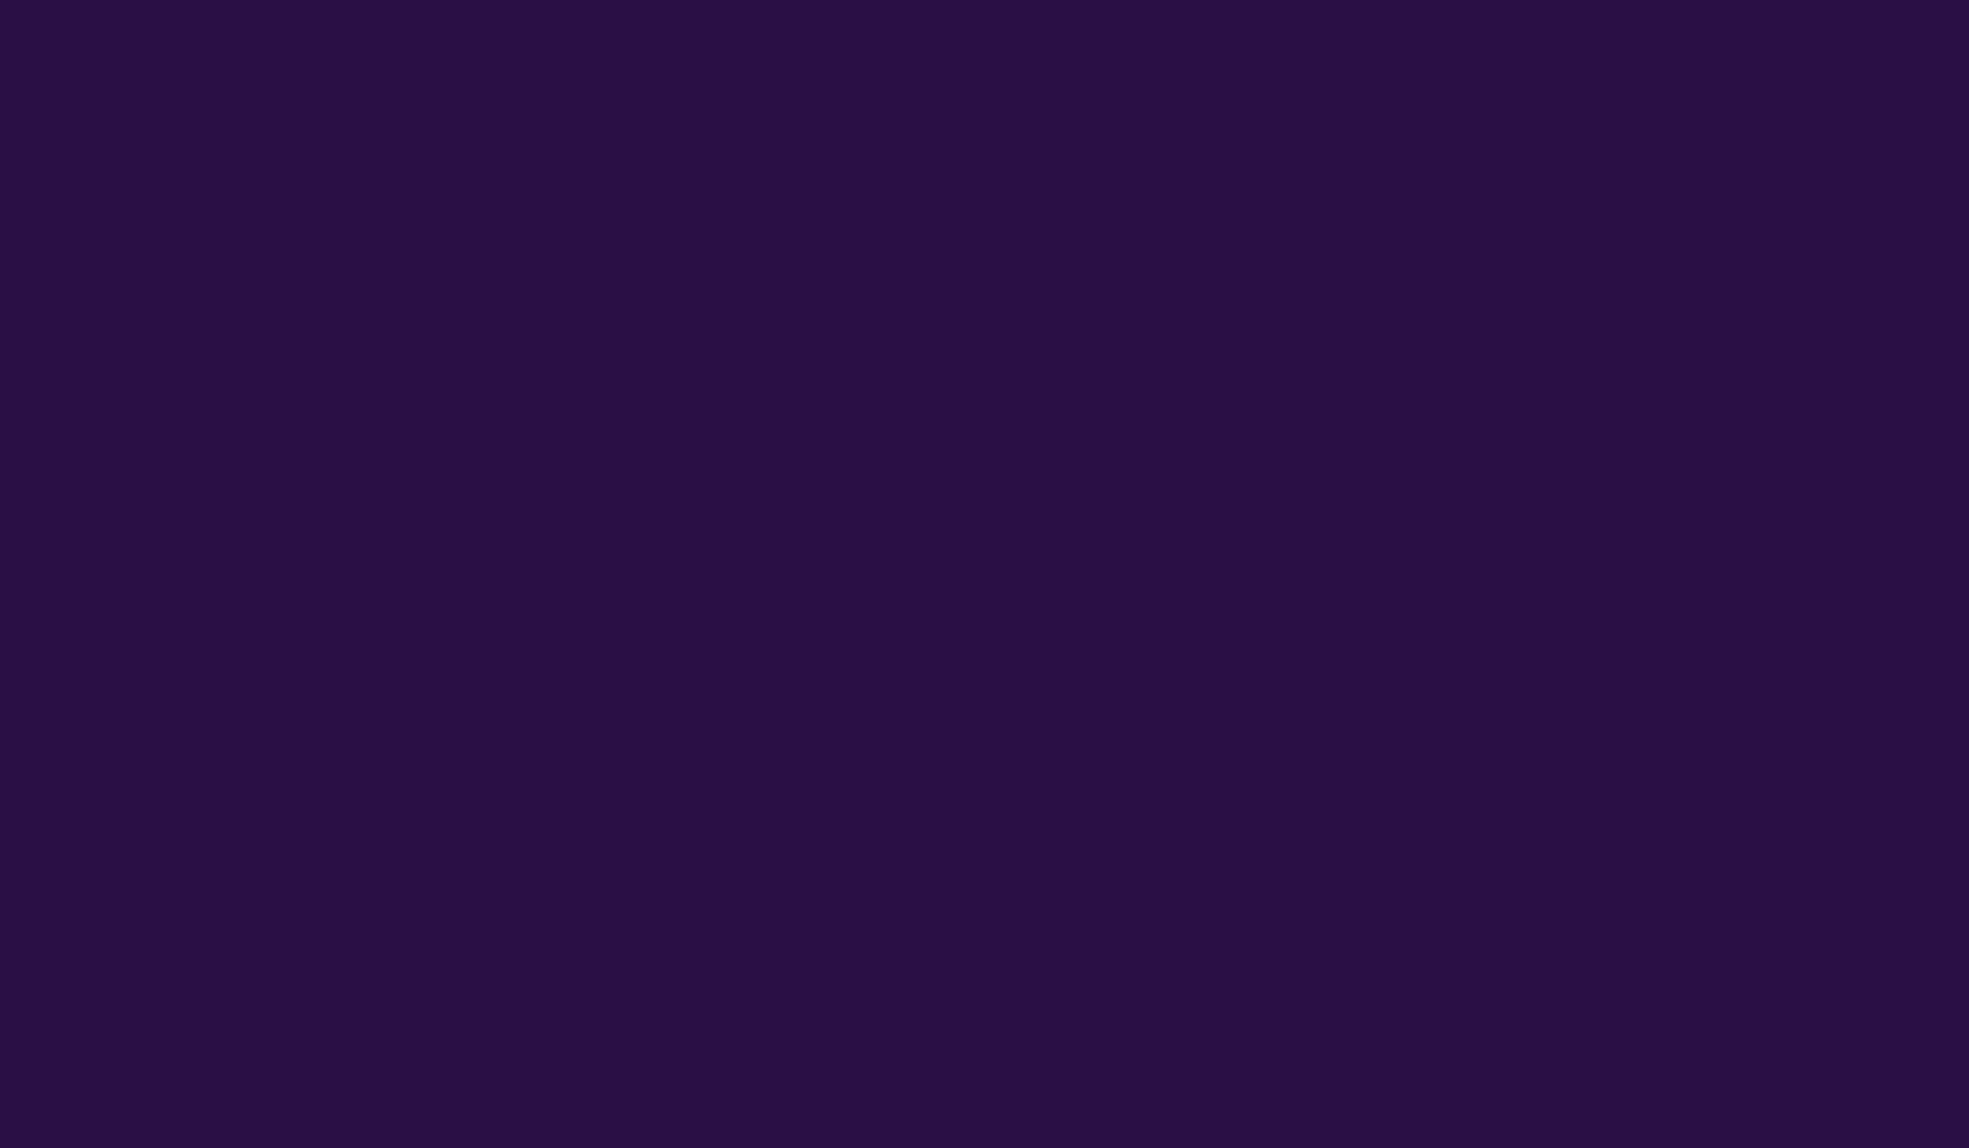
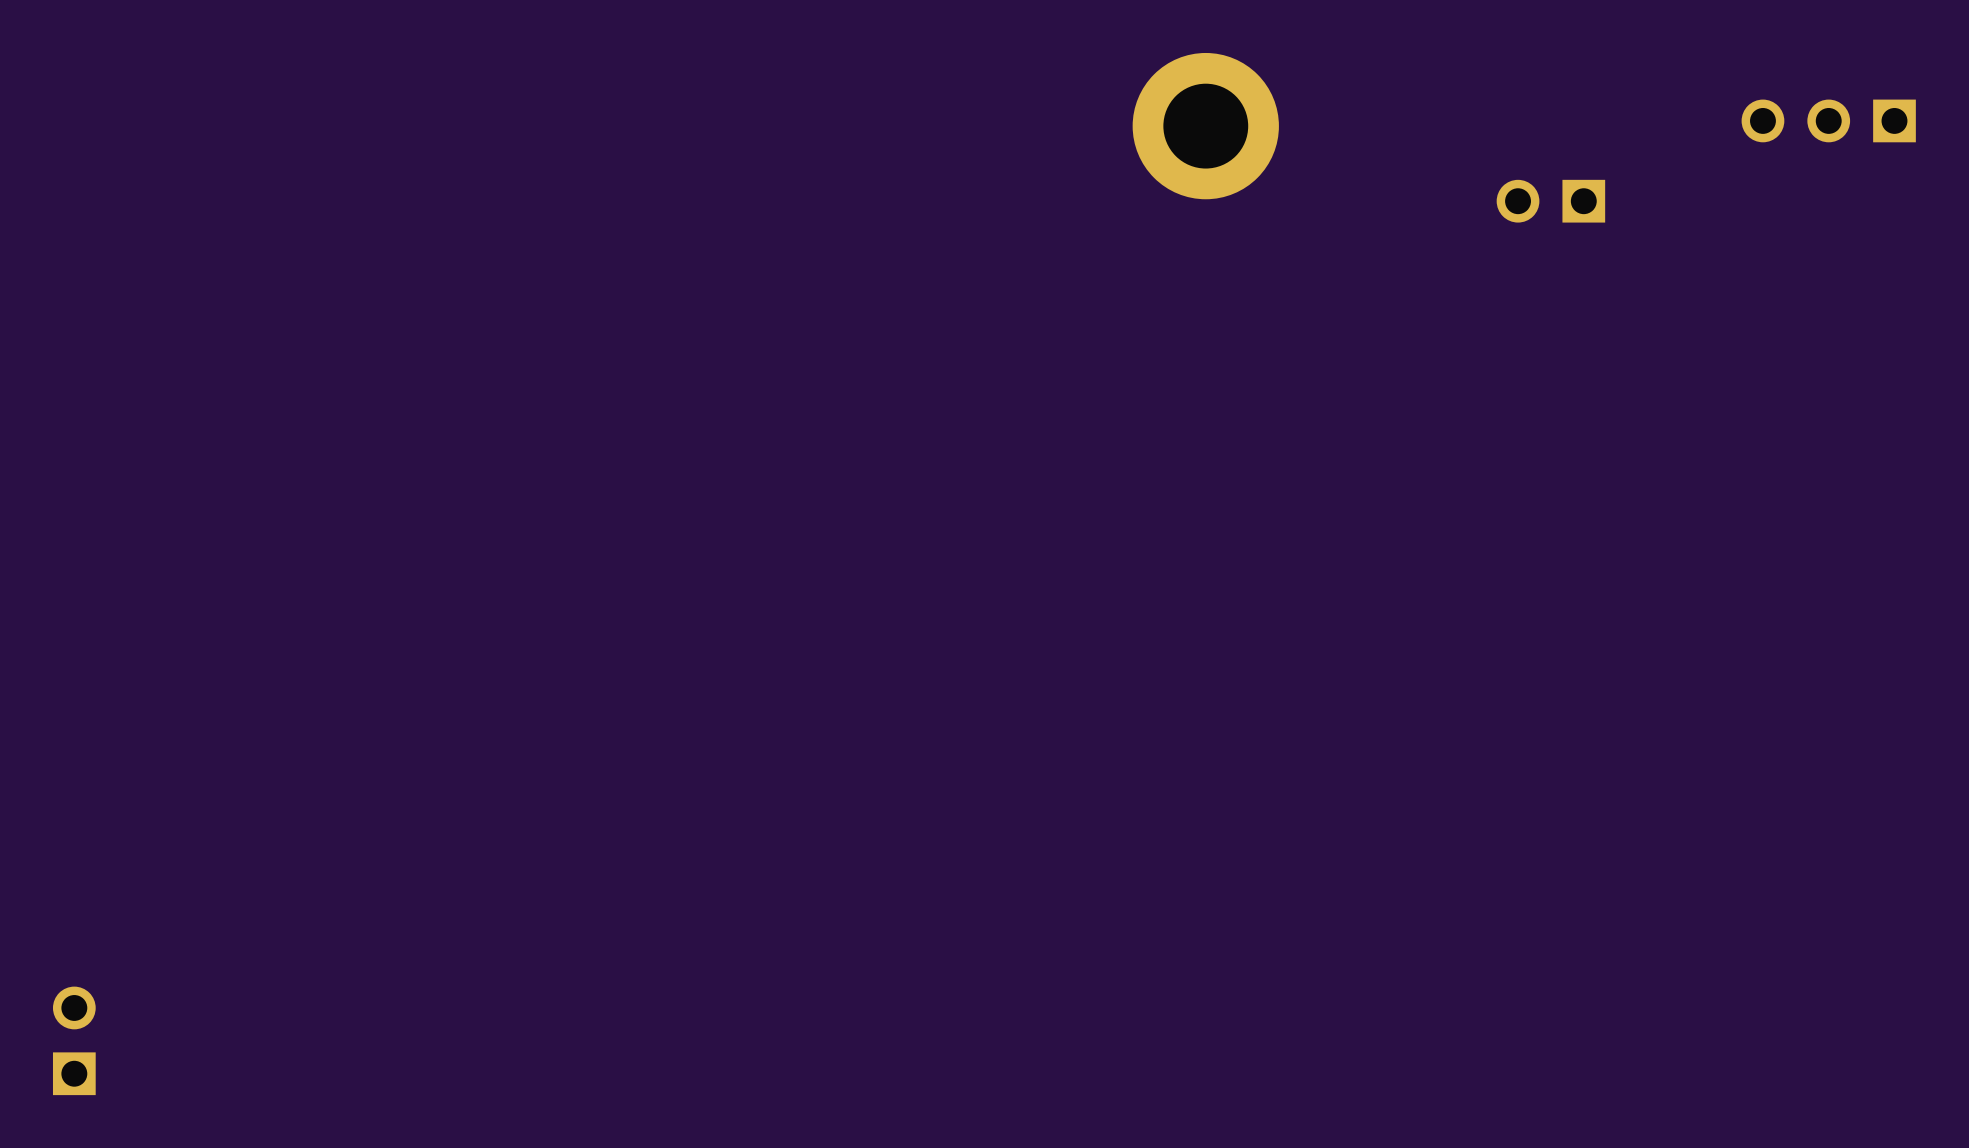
part: none -> (1828, 120)
part: none -> (1205, 126)
part: none -> (1550, 201)
part: none -> (74, 1040)

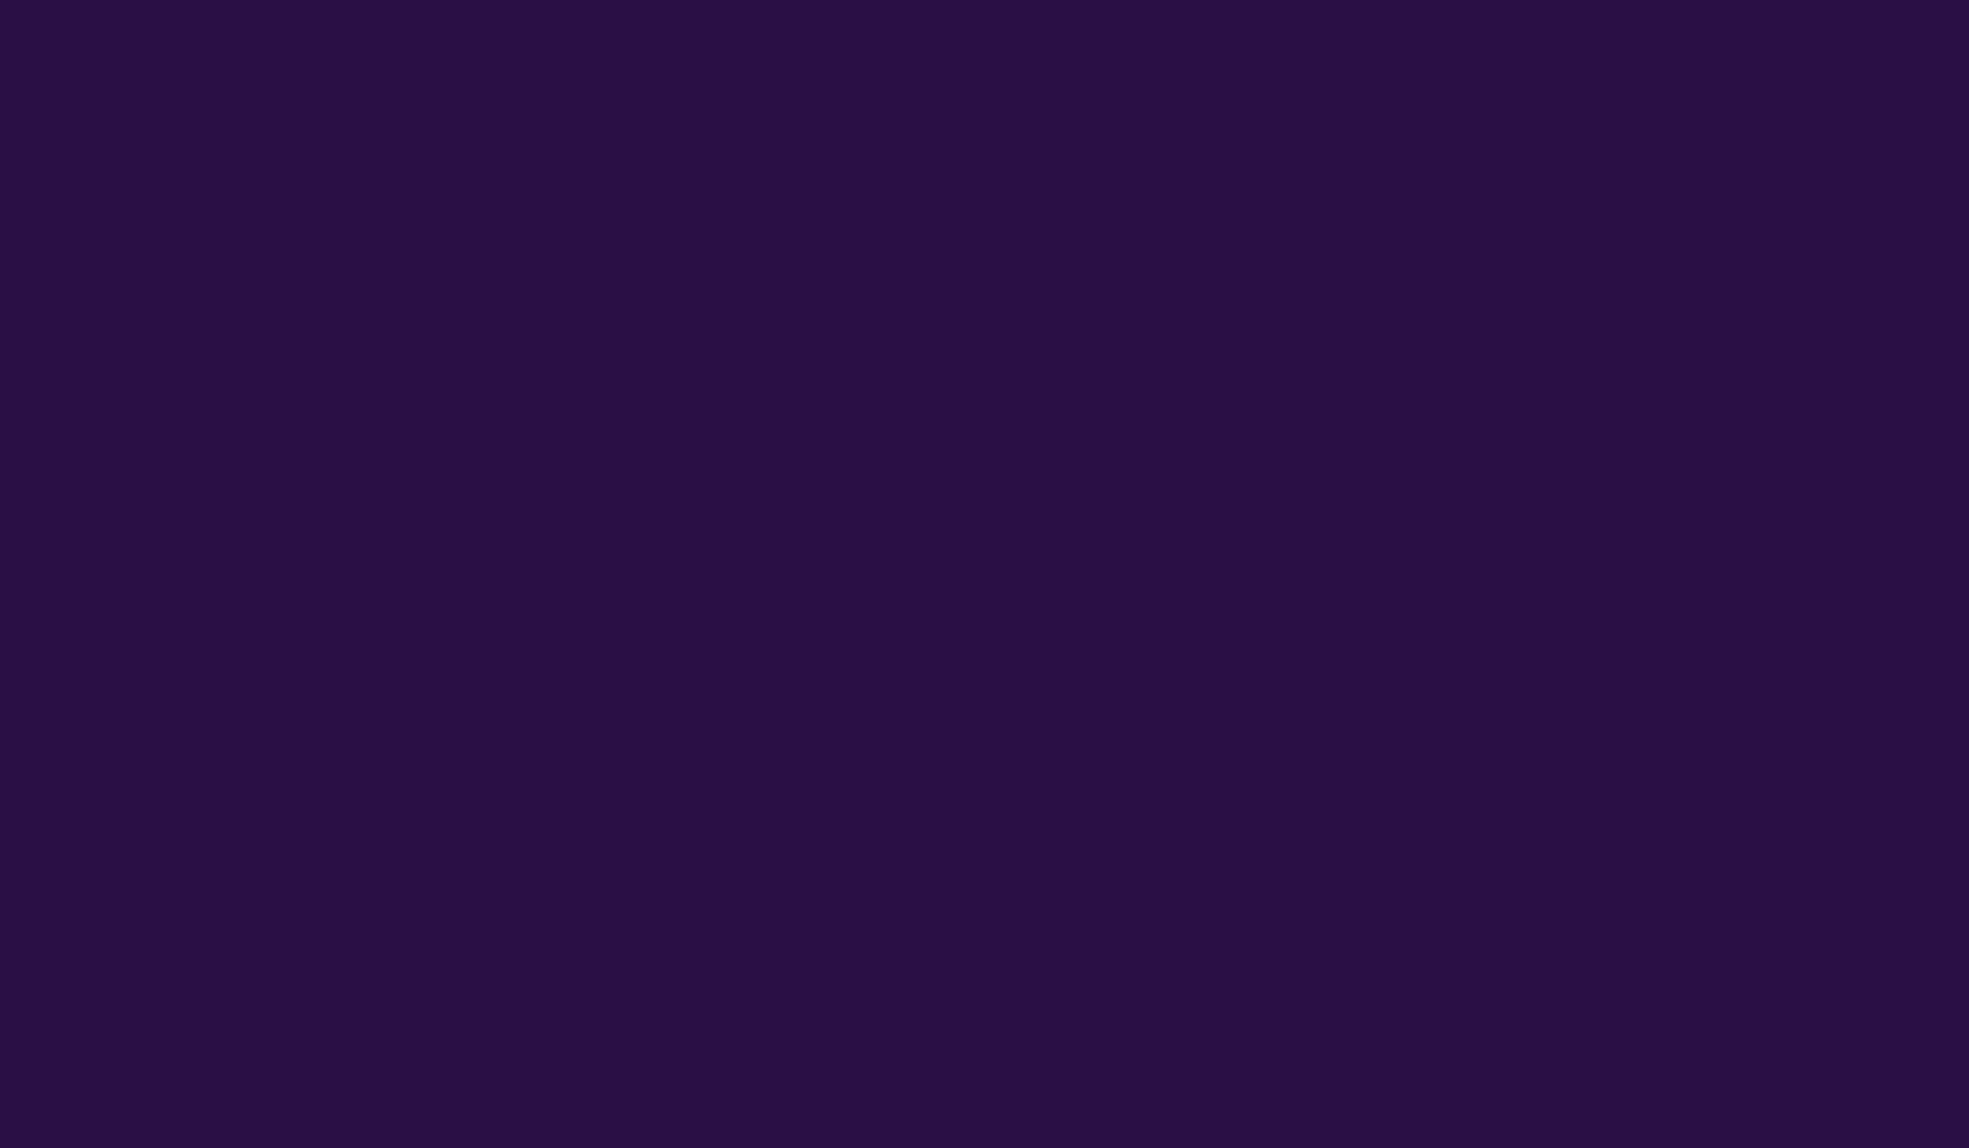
part: (1828, 120) -> none
part: (1205, 126) -> none
part: (1550, 201) -> none
part: (74, 1040) -> none

